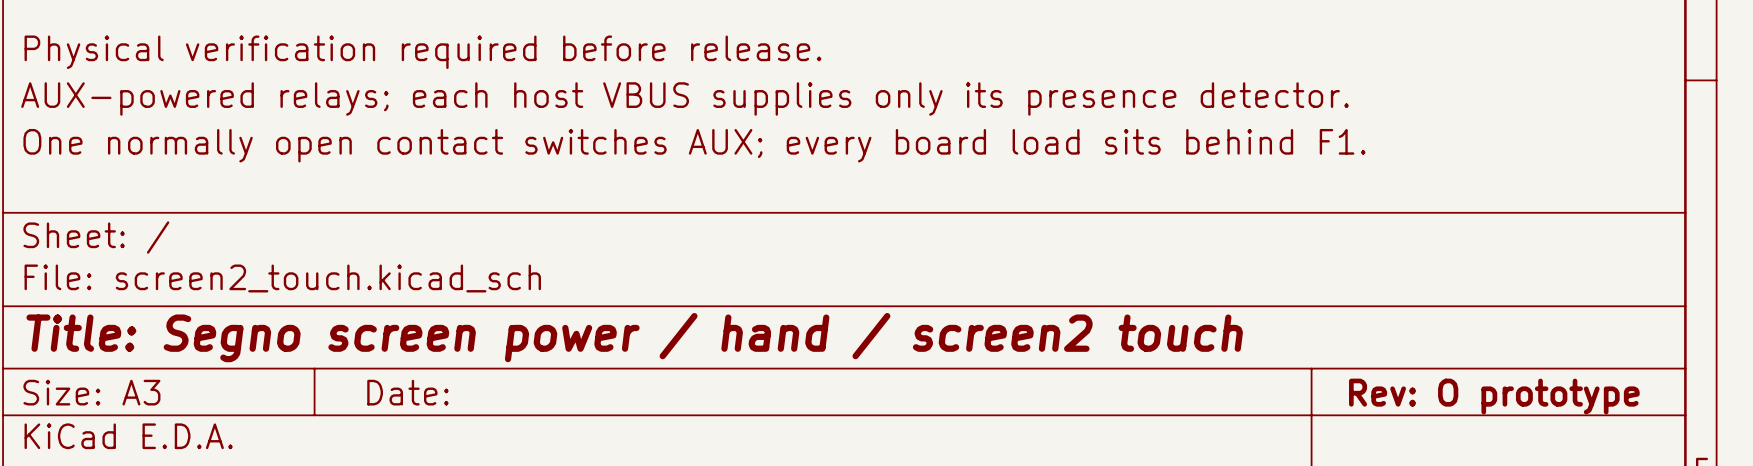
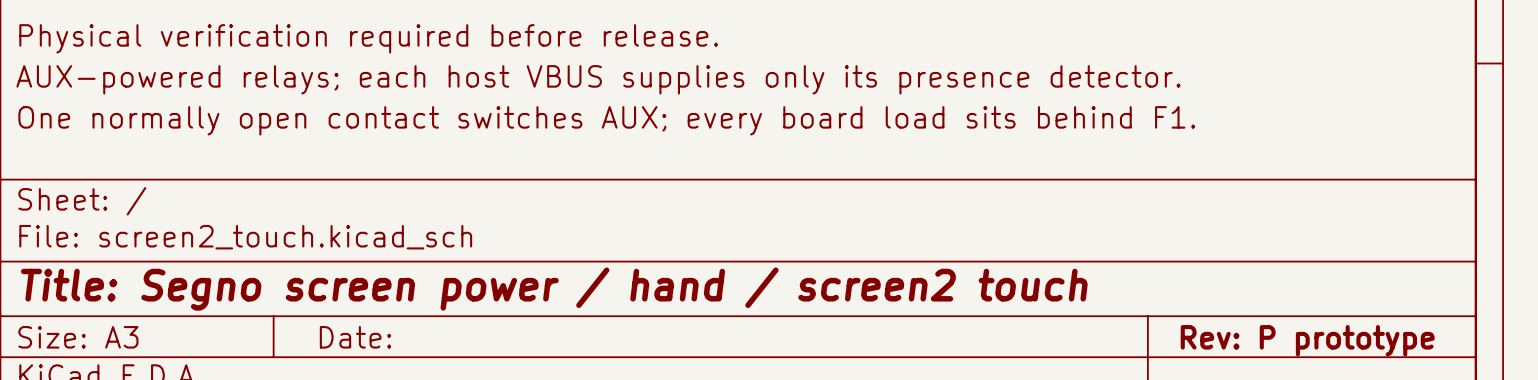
title block: Rev: O prototype (1494, 396) -> Rev: P prototype (1307, 340)

